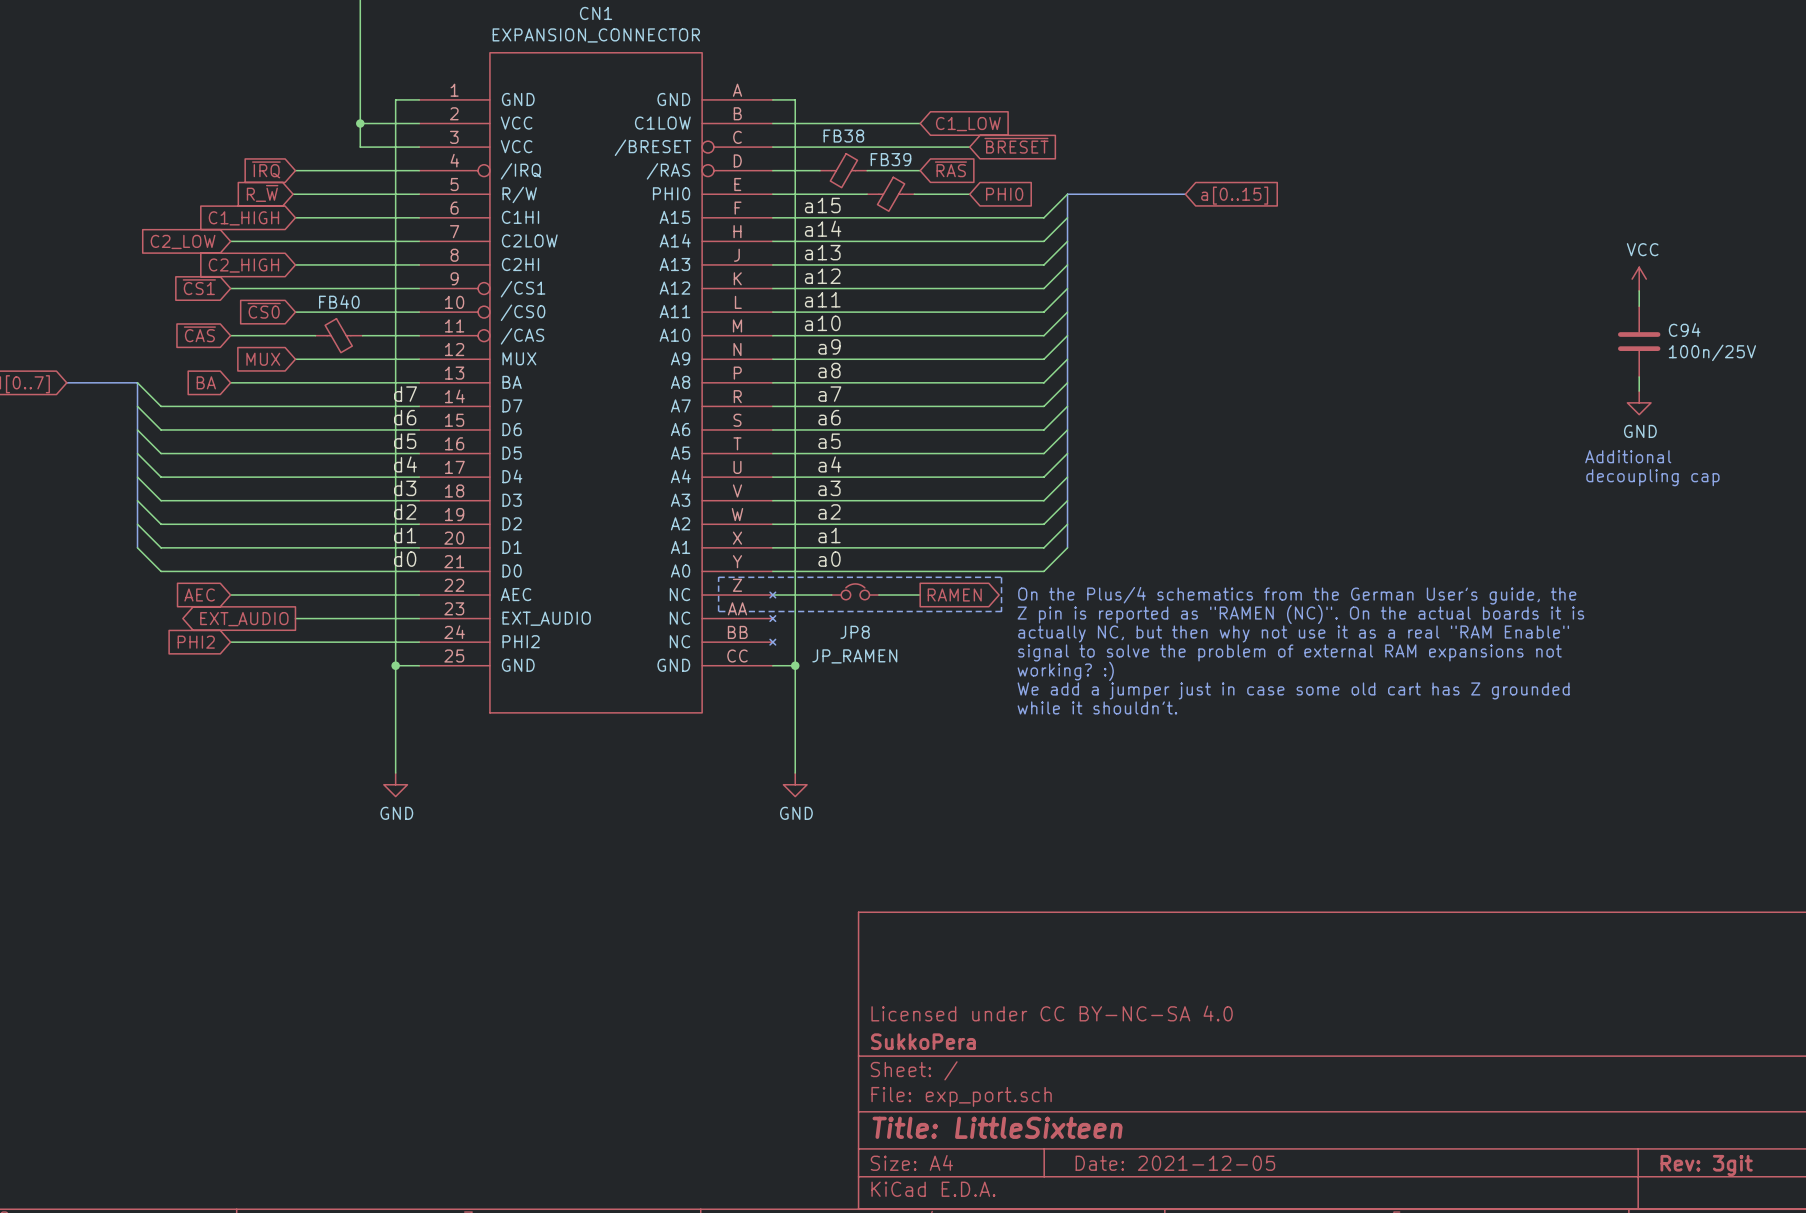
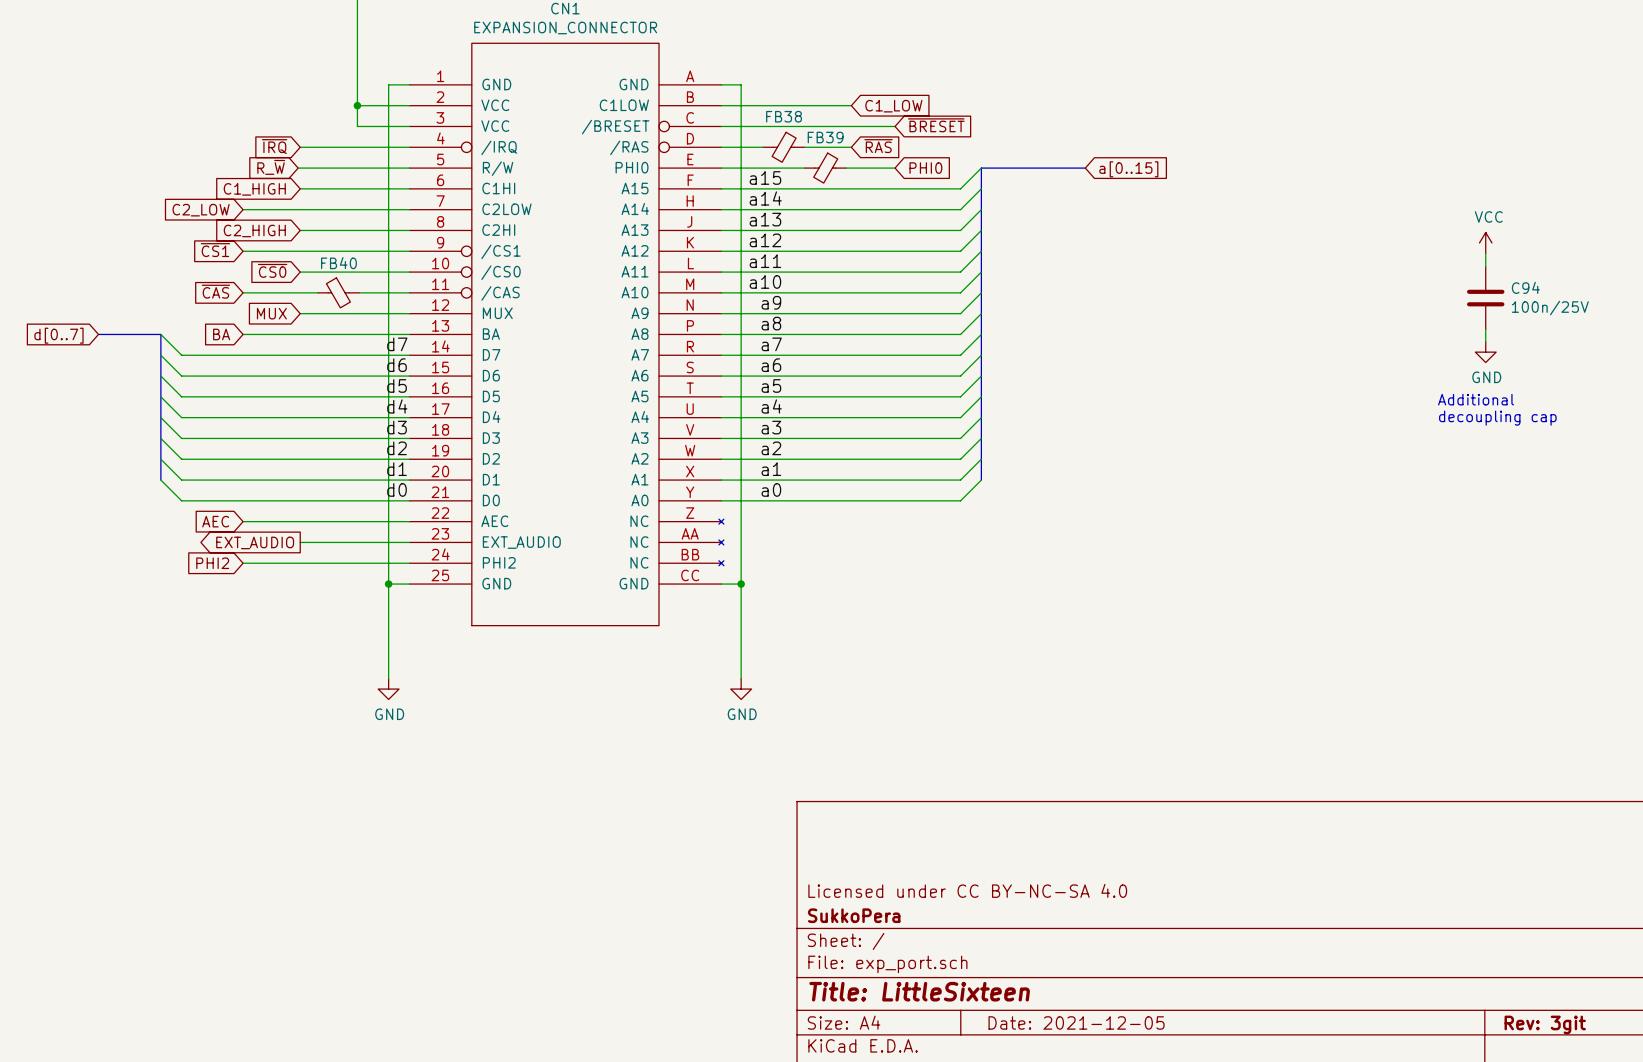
line: (718, 577) (1001, 577) (1001, 611) (718, 611) (718, 577) -> none
JP8: JP_RAMEN (855, 591) -> none
wire: (772, 595) (831, 595) -> none
wire: (878, 595) (920, 595) -> none
global label: RAMEN (954, 595) -> none
text: On the Plus/4 schematics from the German User's guide, the (1297, 595) -> none
text: Z pin is reported as "RAMEN (NC)". On the actual boards it is (1300, 614) -> none
text: actually NC, but then why not use it as a real "RAM Enable" (1293, 633) -> none
text: signal to solve the problem of external RAM expansions not (1289, 652) -> none
text: working? :) (1065, 671) -> none
text: We add a jumper just in case some old cart has Z grounded (1293, 690) -> none
text: while it shouldn't. (1097, 707) -> none

